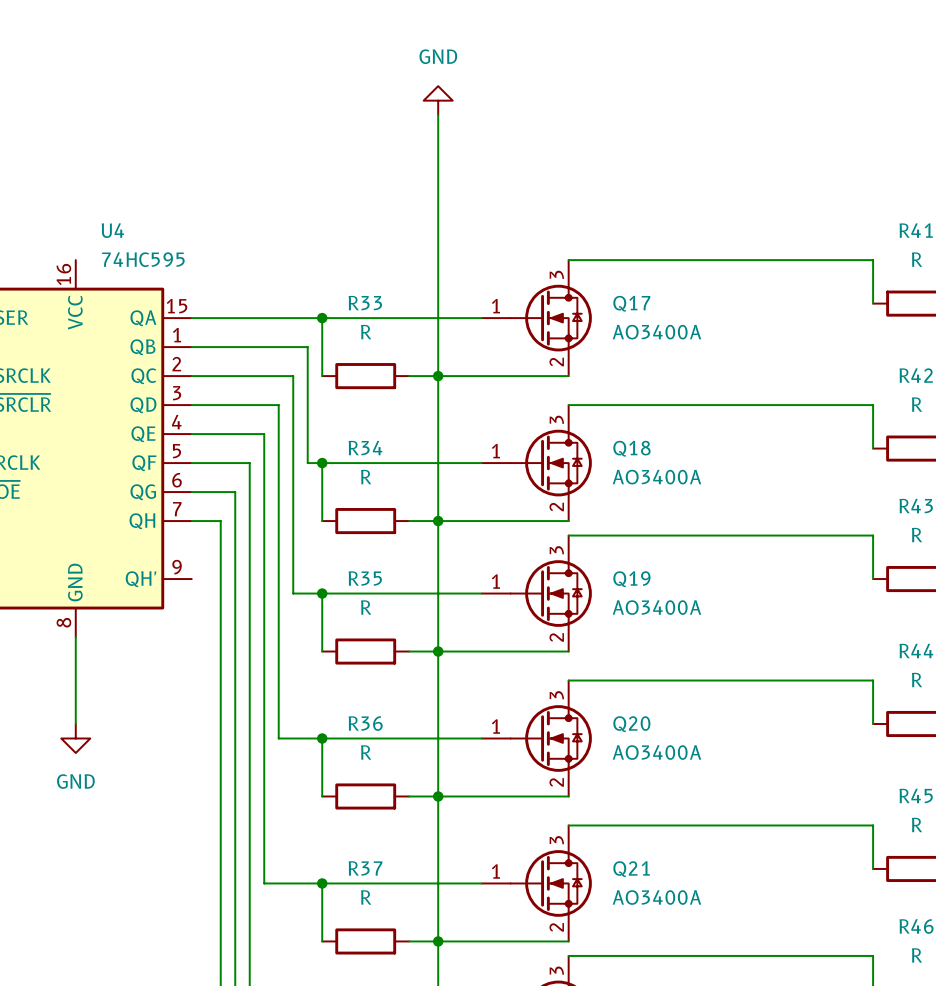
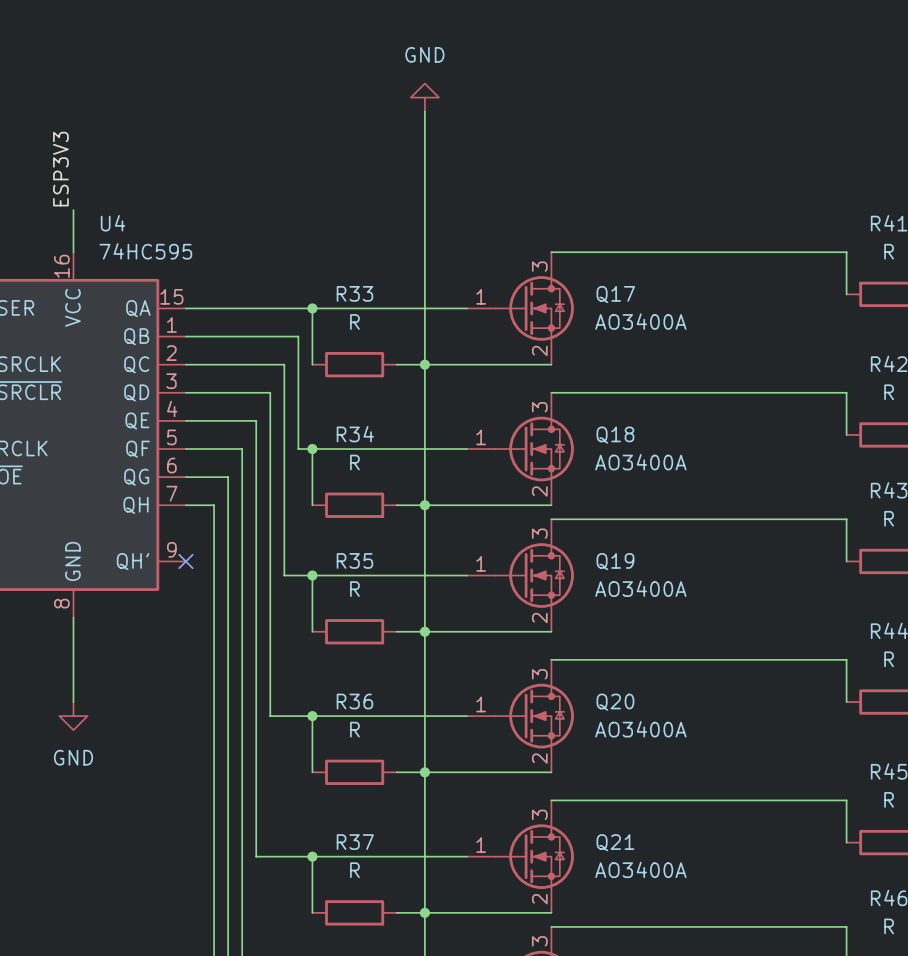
label: none -> ESP3V3 (60, 169)
wire: none -> (73, 210) (73, 252)
no-connect mark: none -> (185, 561)

